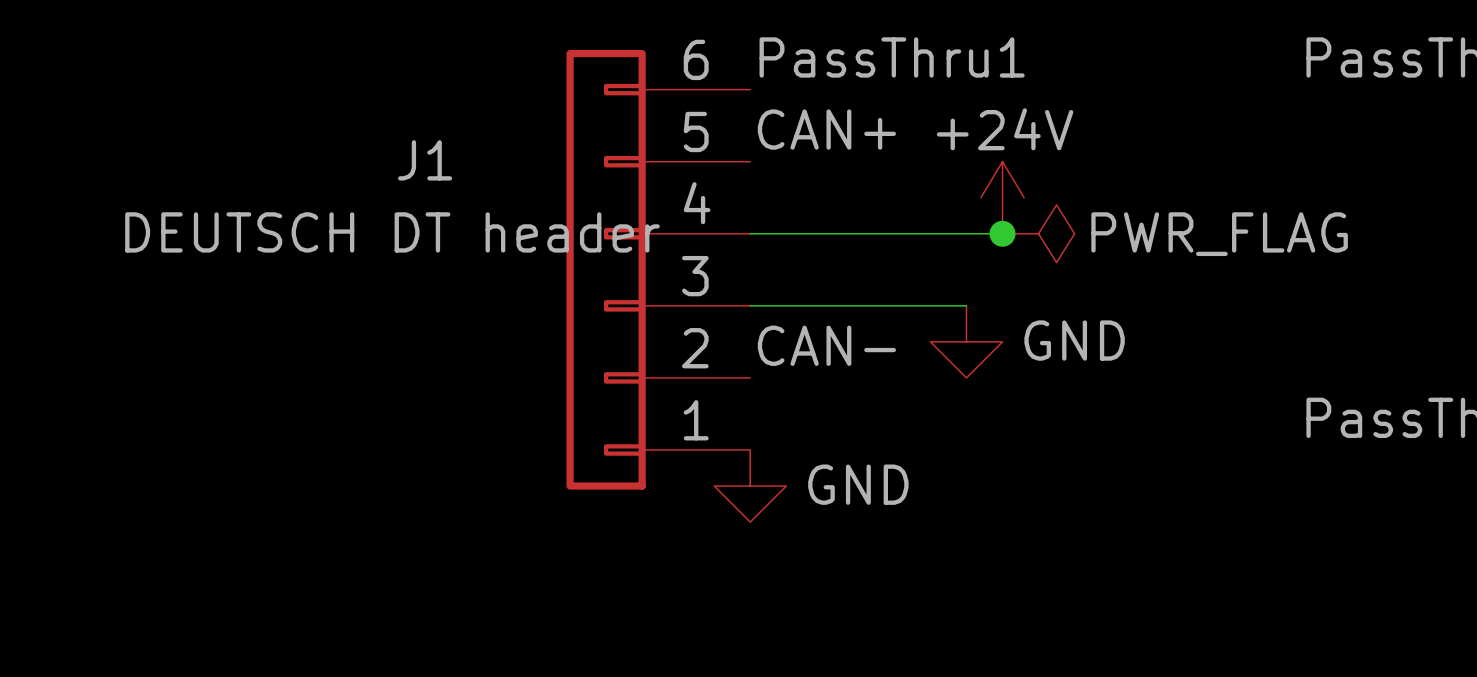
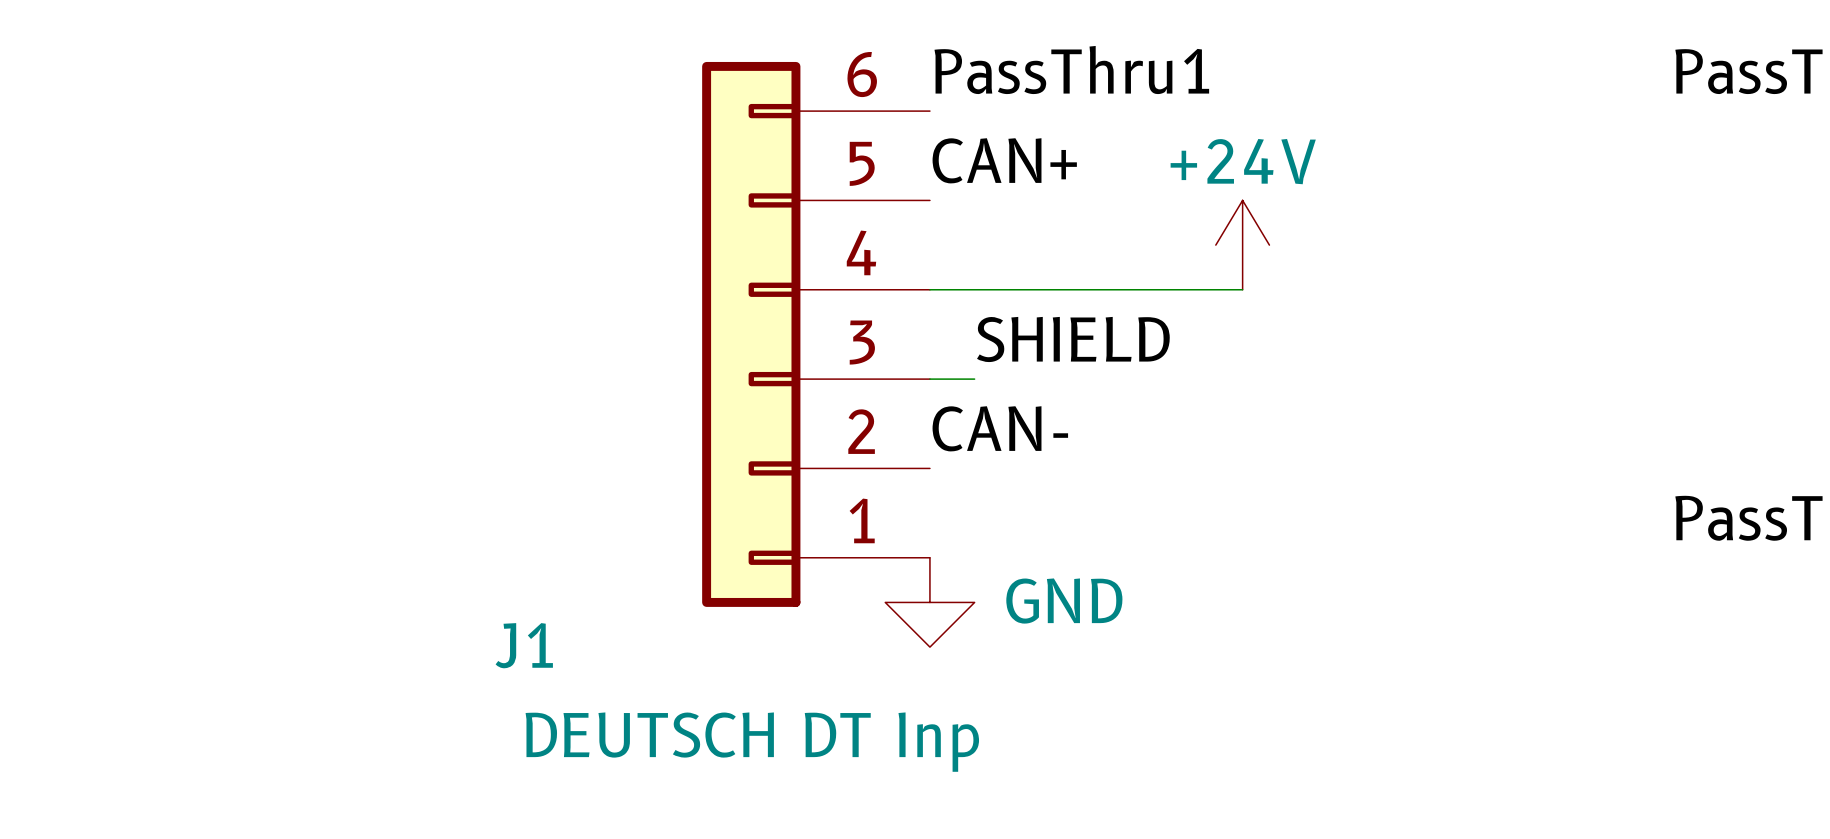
J1 name position: J1 (425, 160) -> J1 (524, 645)
J1 value: DEUTSCH DT header (392, 232) -> DEUTSCH DT Inp (752, 742)
junction: (1002, 233) -> none
power symbol: PWR_FLAG (1038, 233) -> none
label: none -> SHIELD (1073, 339)
wire: (786, 305) (966, 305) -> none
power symbol: GND (966, 341) -> none

